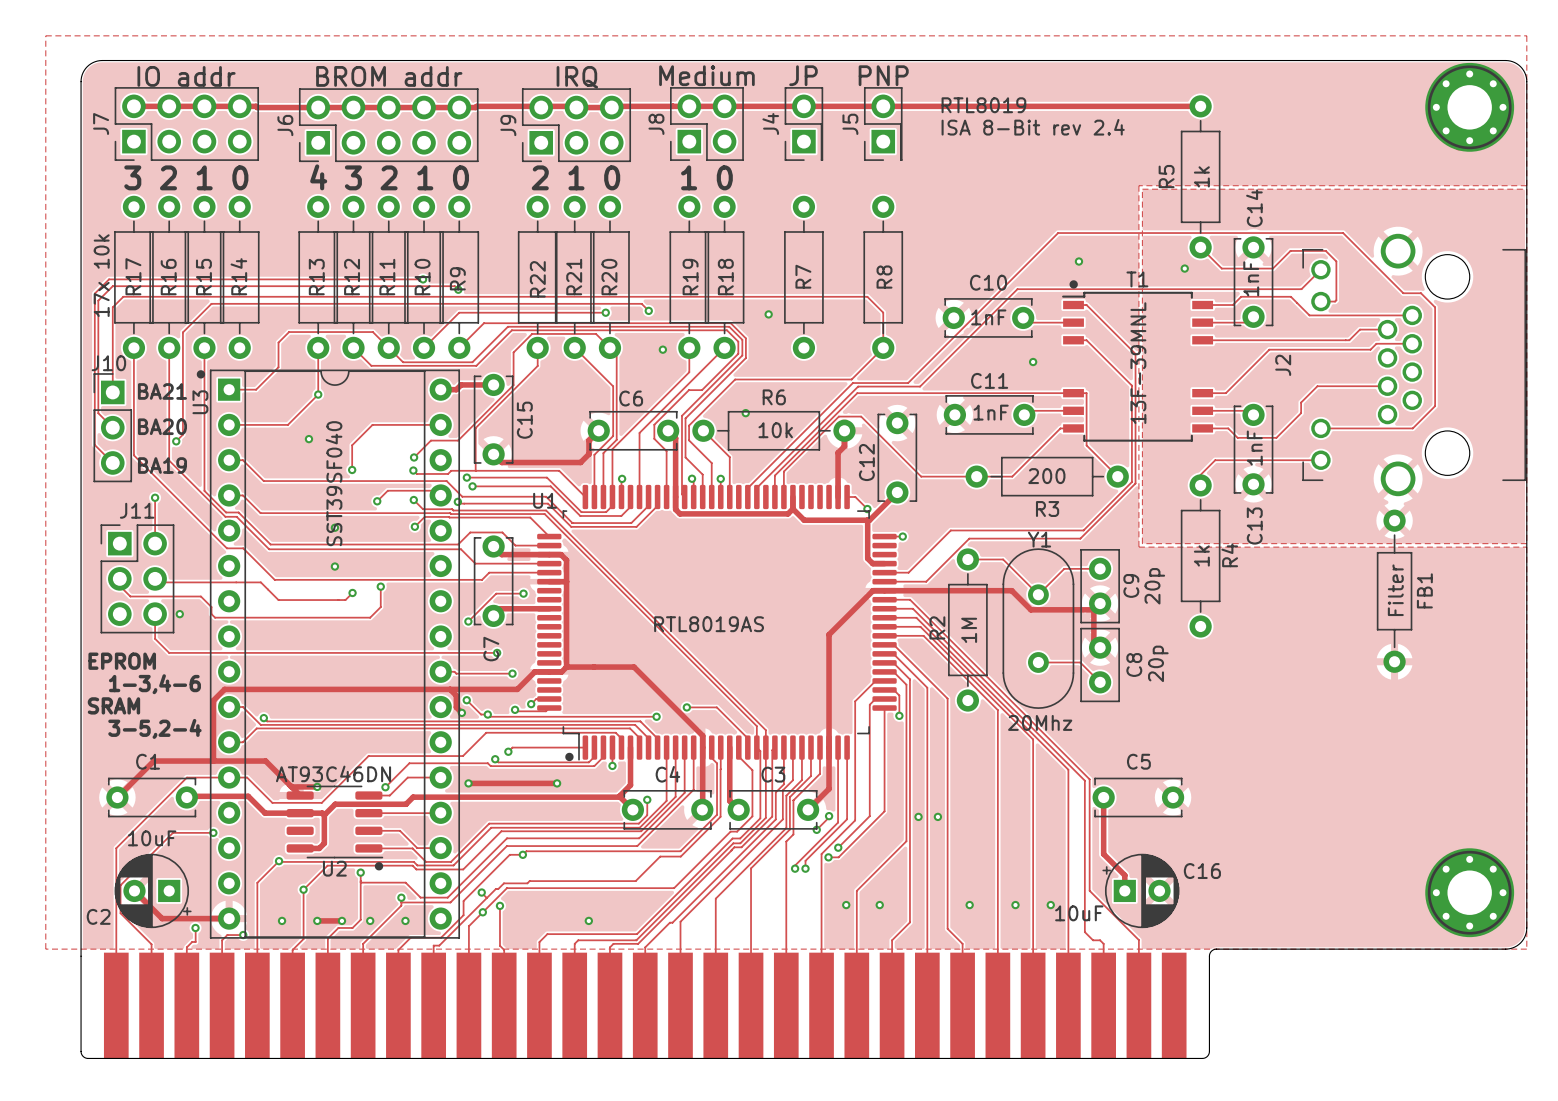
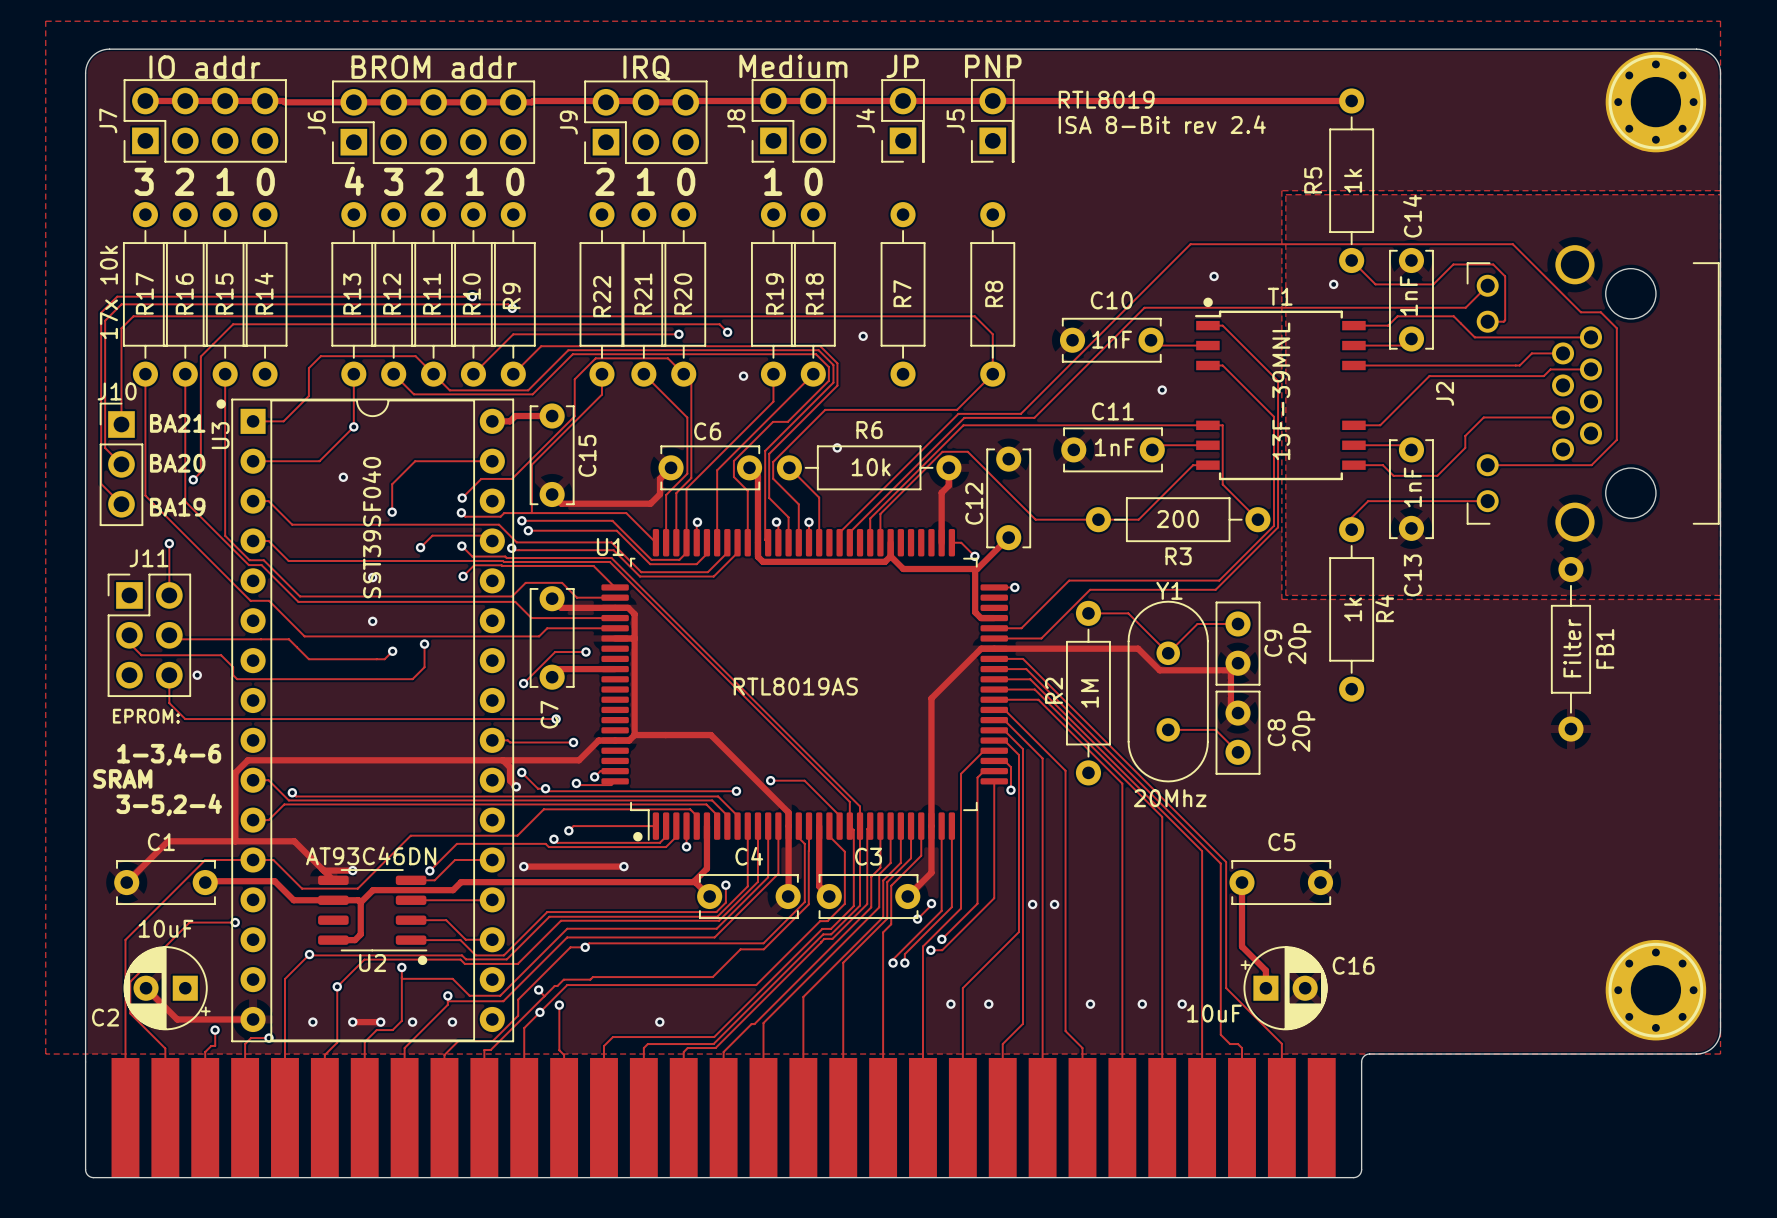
text: EPROM (122, 661) -> EPROM: (146, 716)

